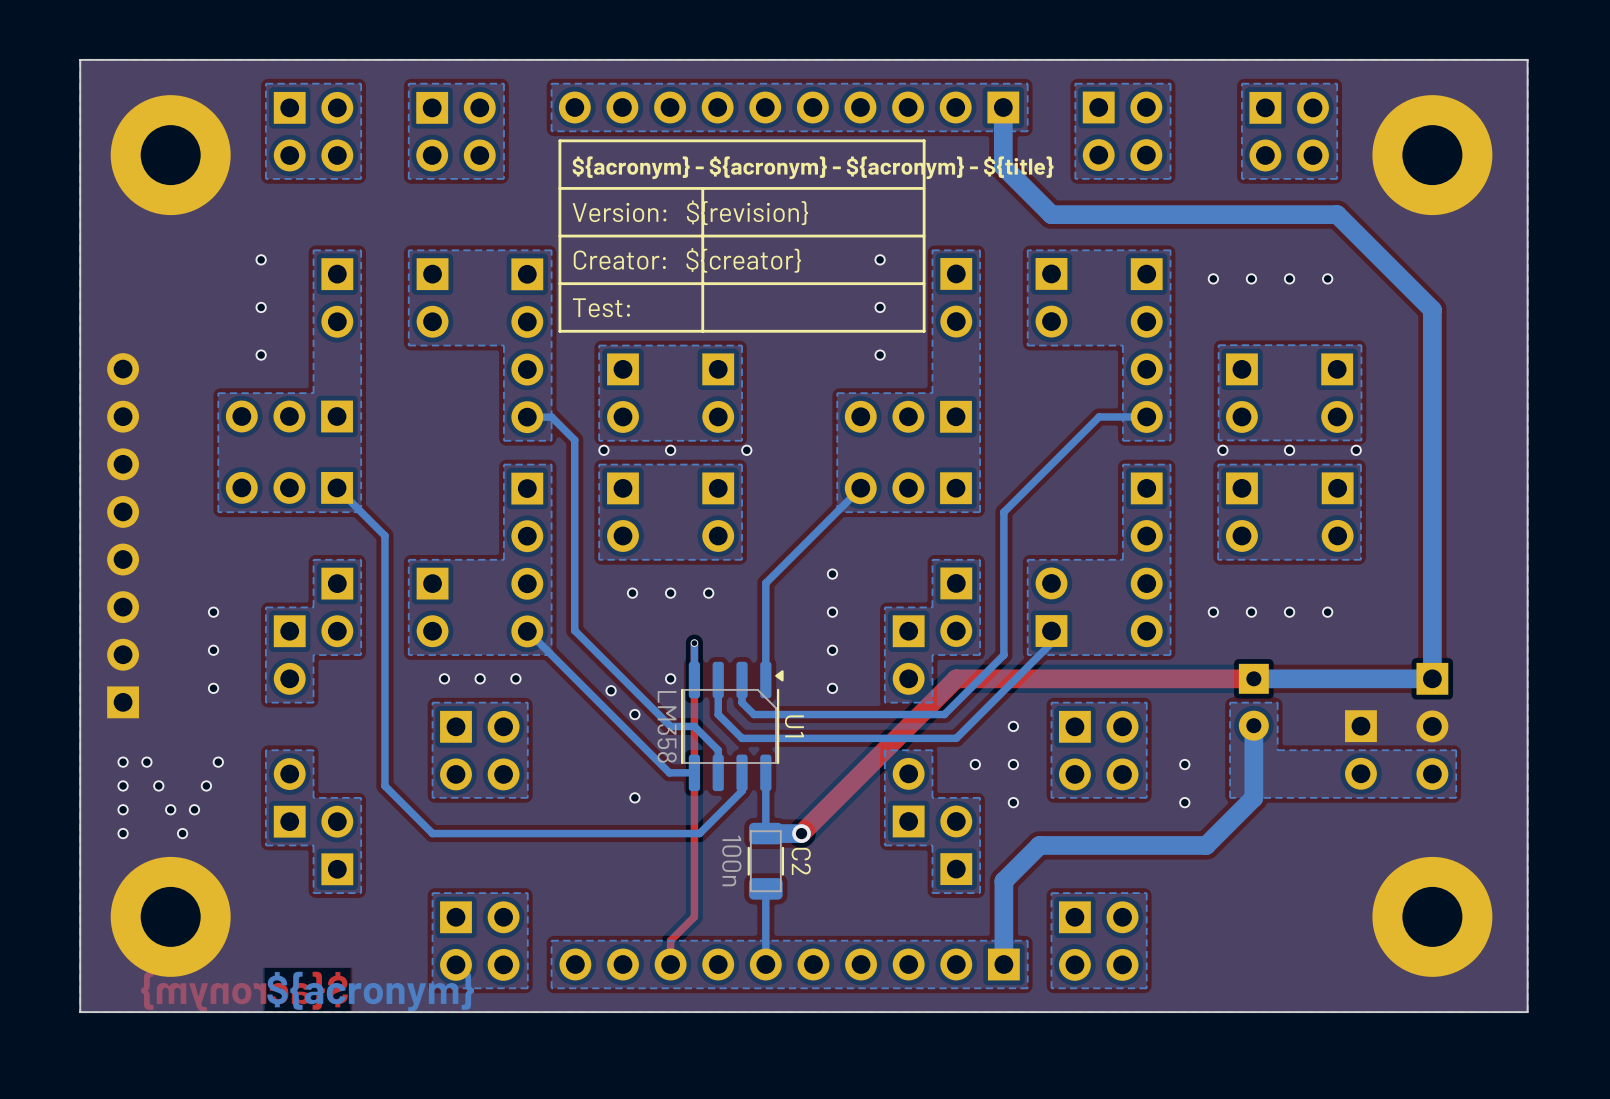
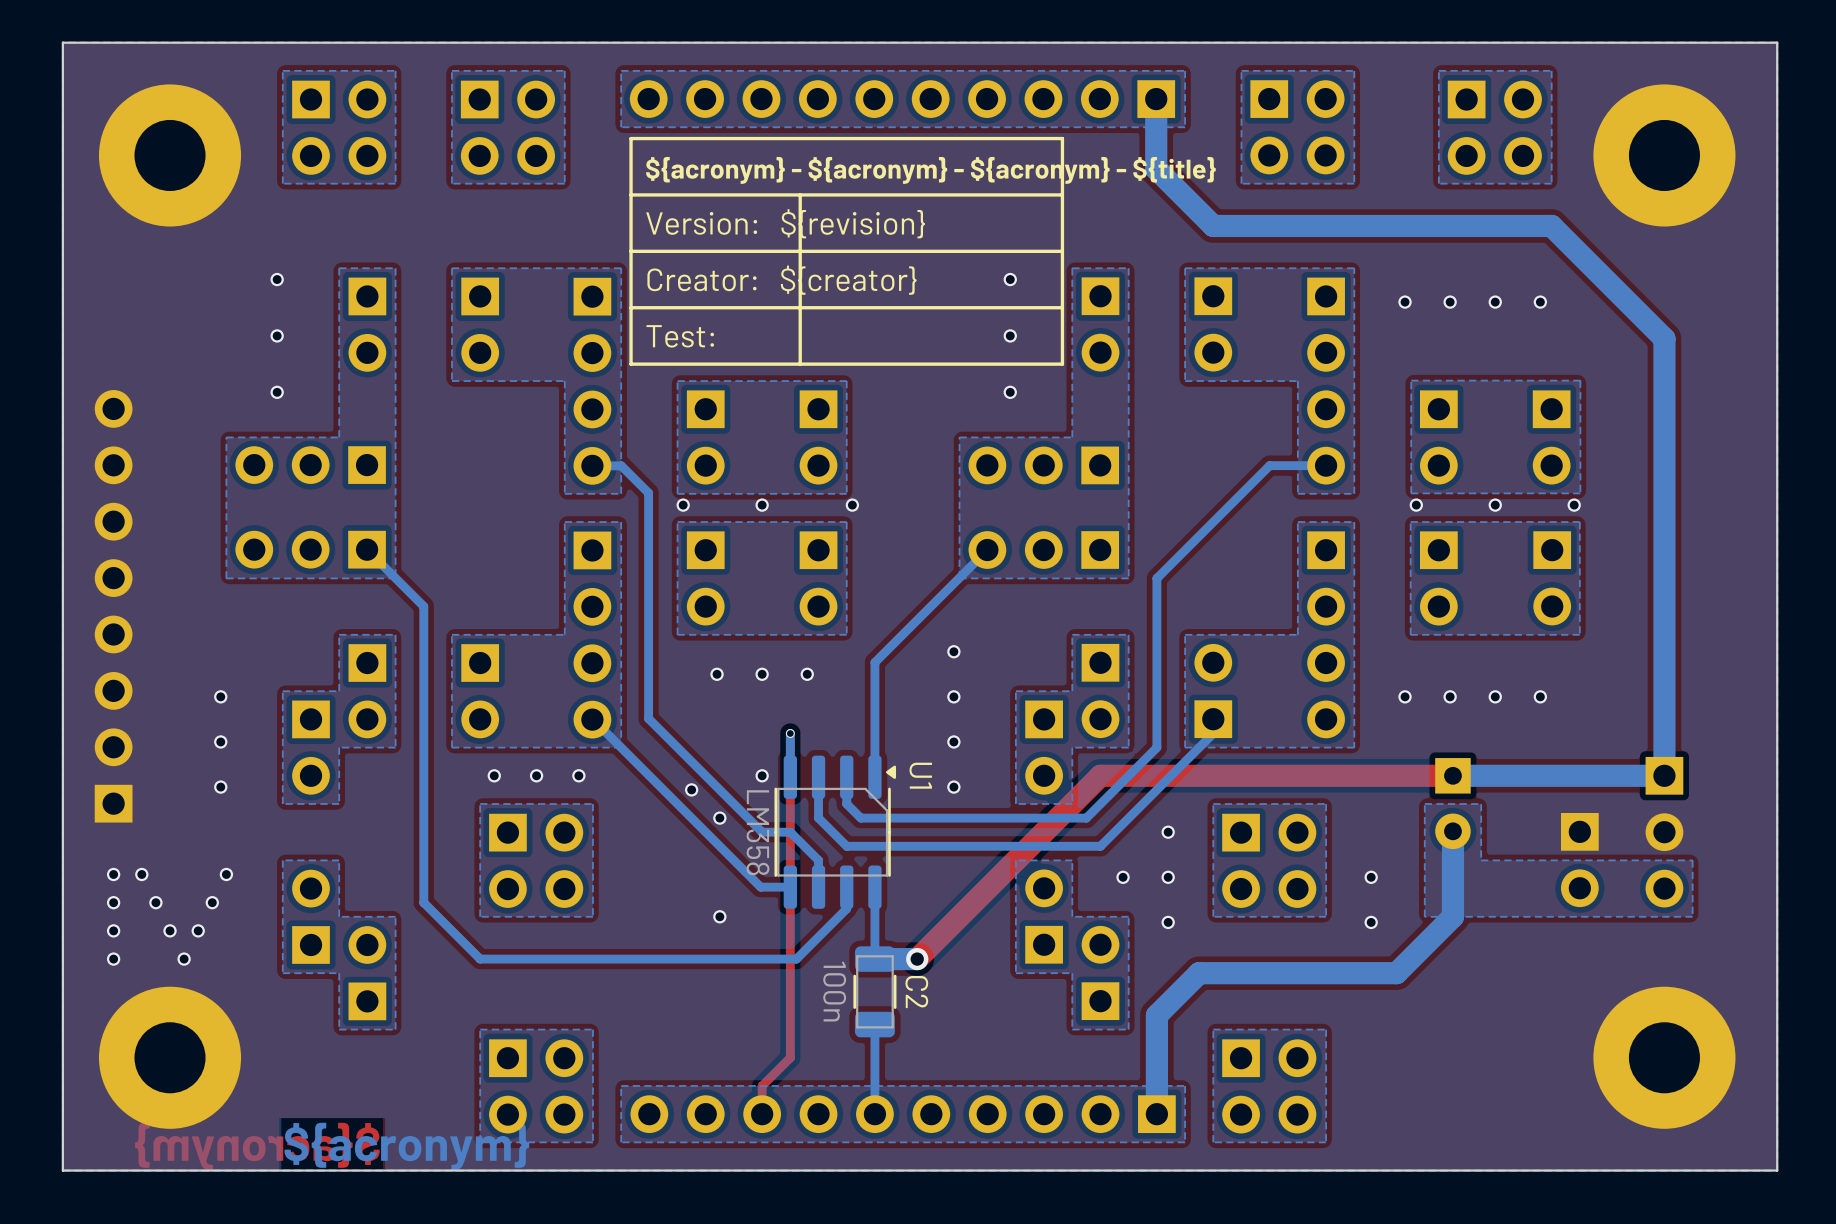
U1 name position: U1 (794, 726) -> U1 (920, 775)

